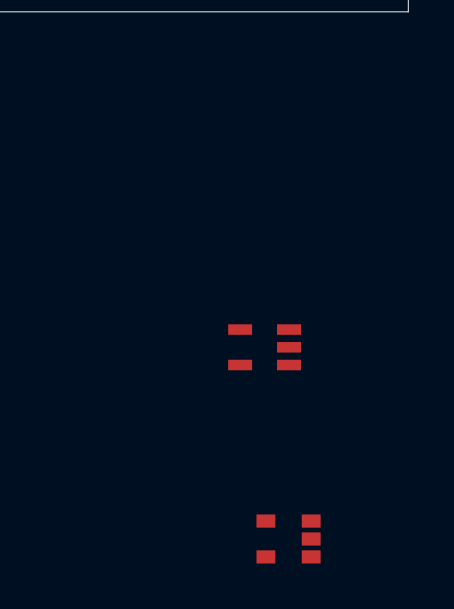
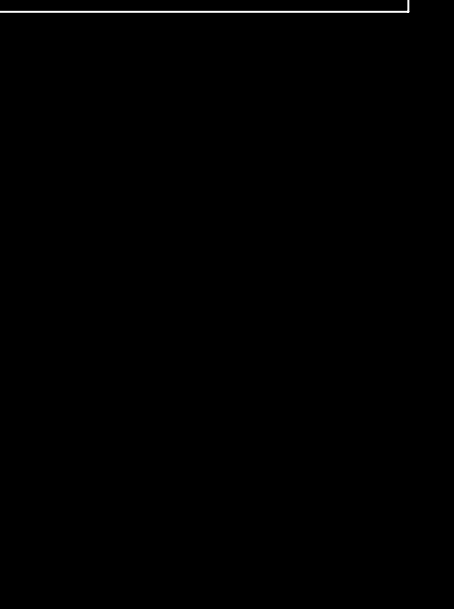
part: (264, 347) -> none
part: (288, 538) -> none

